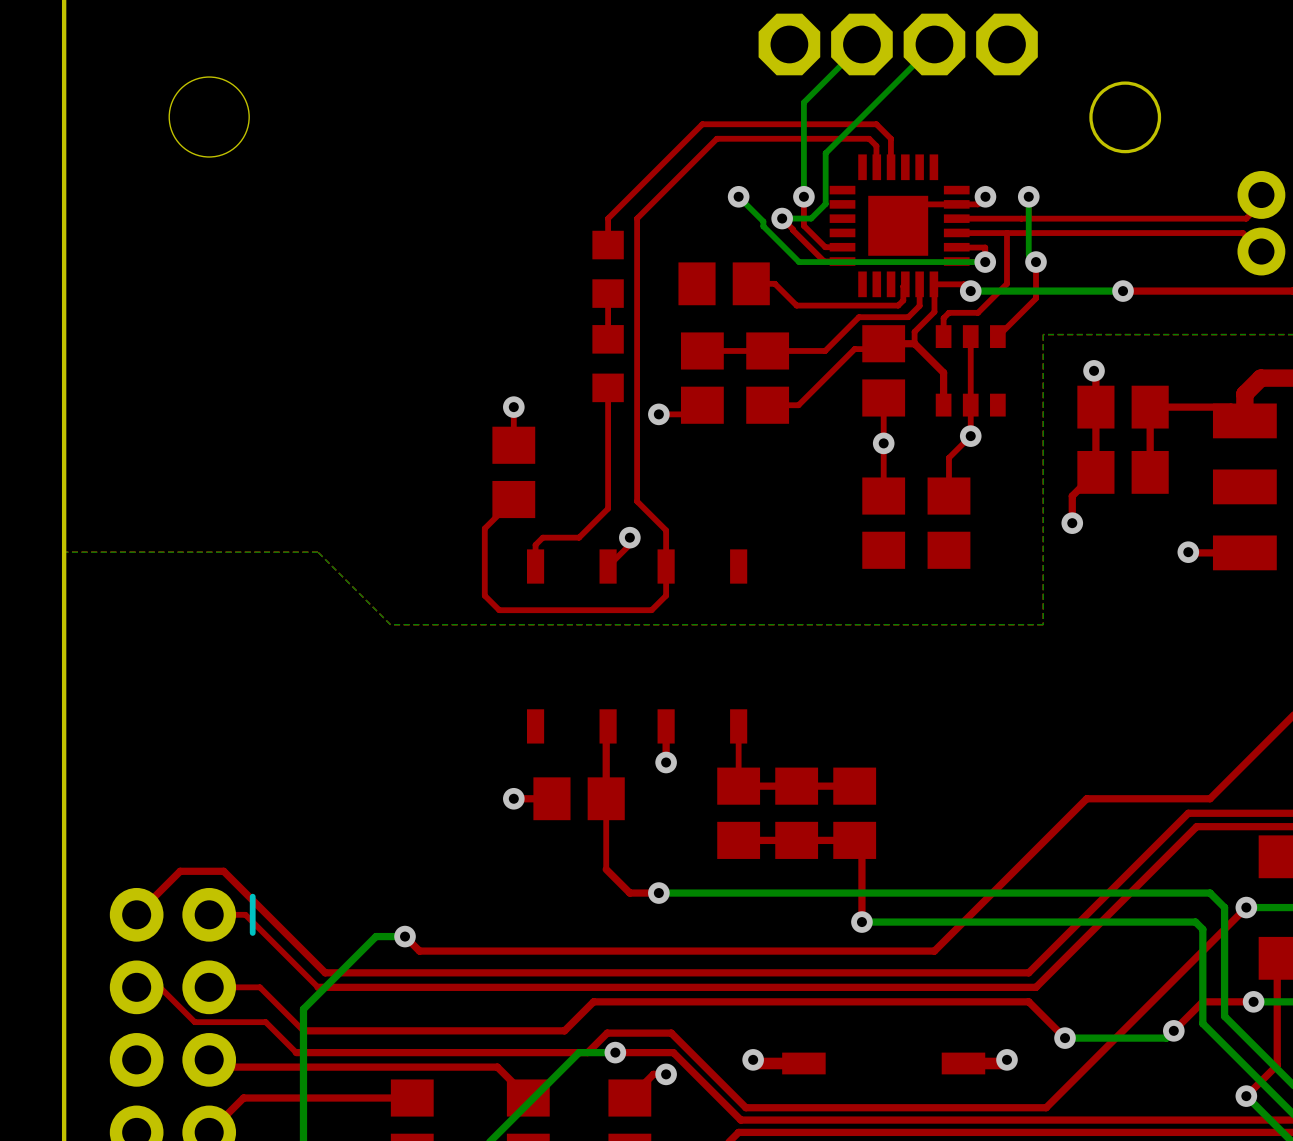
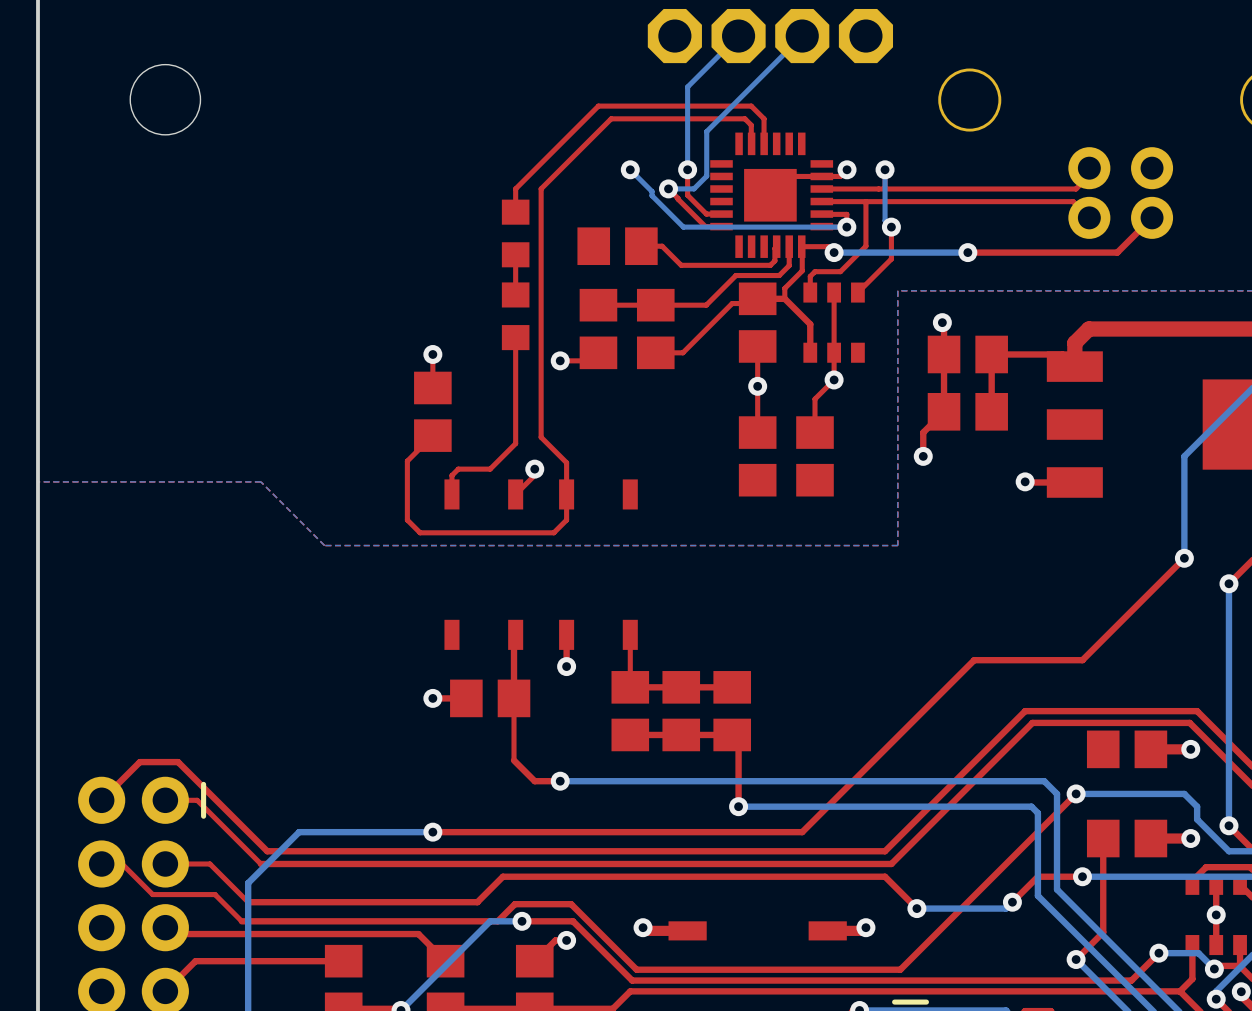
top track: (1253, 755) (1210, 798) (1086, 798) -> (1082, 660) (974, 660) (936, 698)
top track: (405, 936) (419, 951) (513, 951) -> none
bottom track: (405, 936) (376, 936) (361, 951) -> (432, 832) (299, 832)
via position: (405, 936) -> (432, 832)

